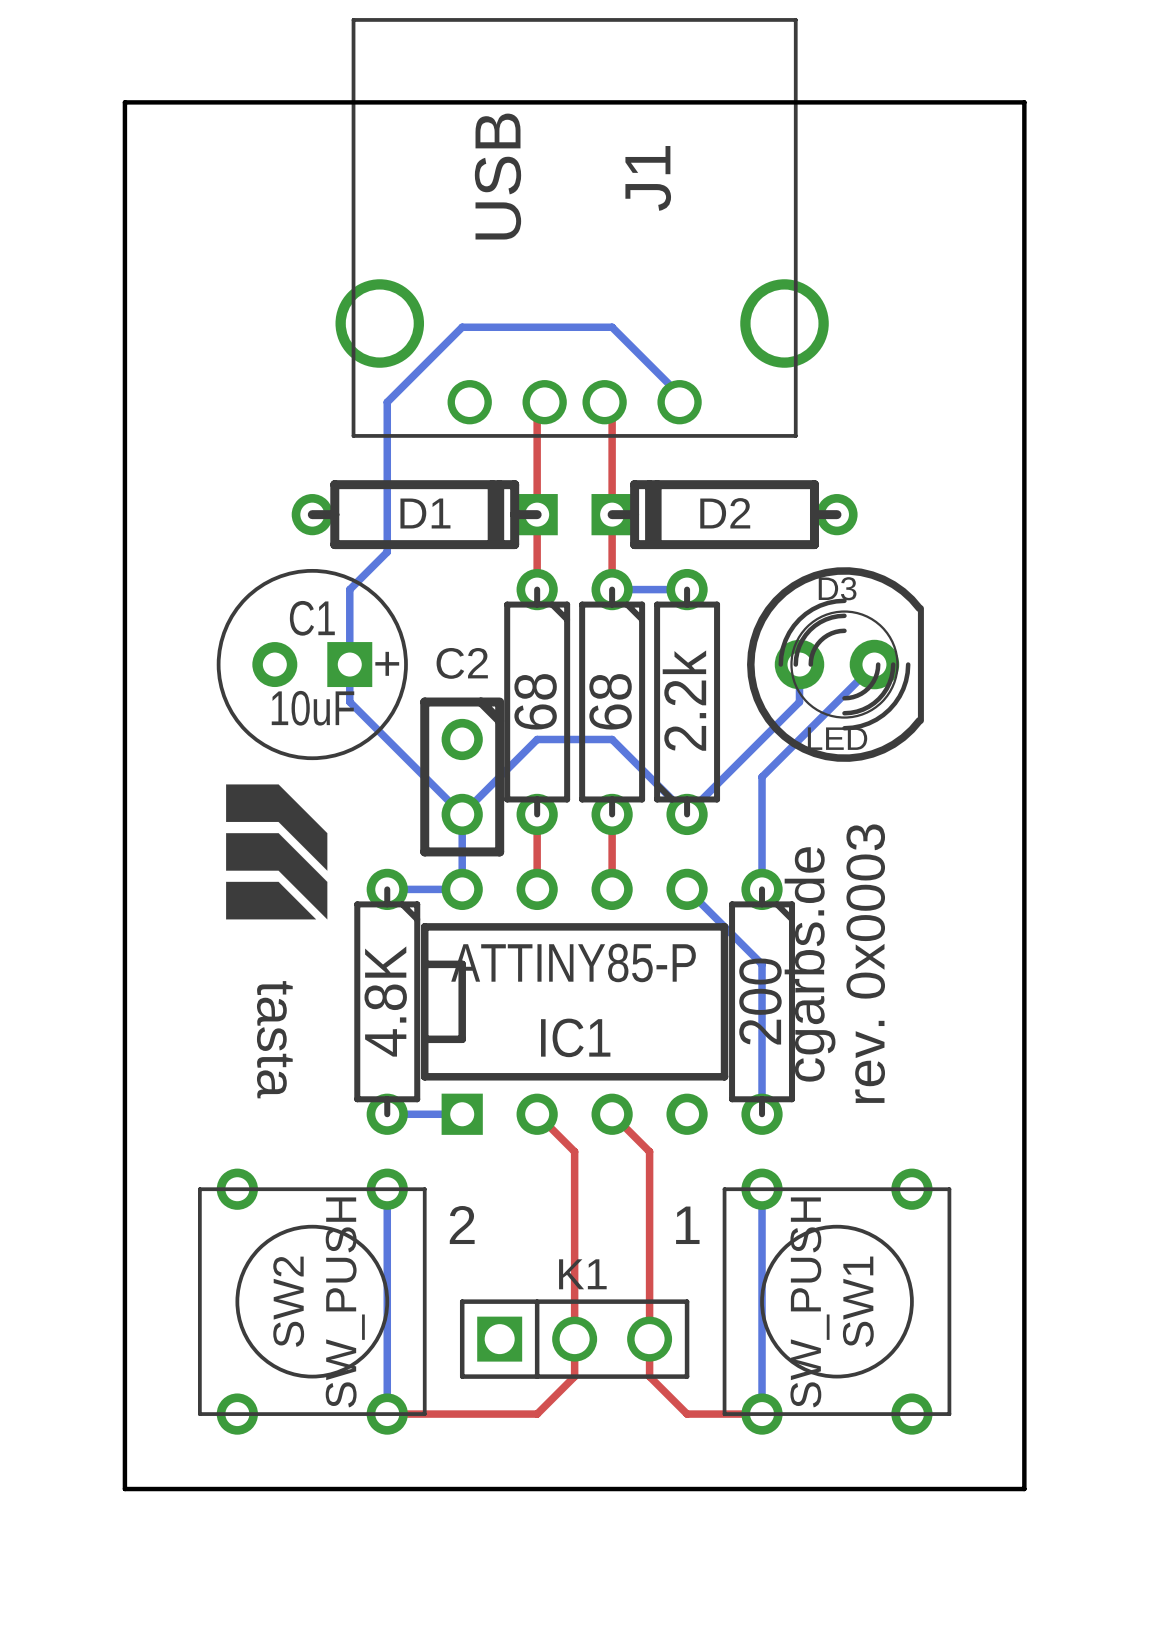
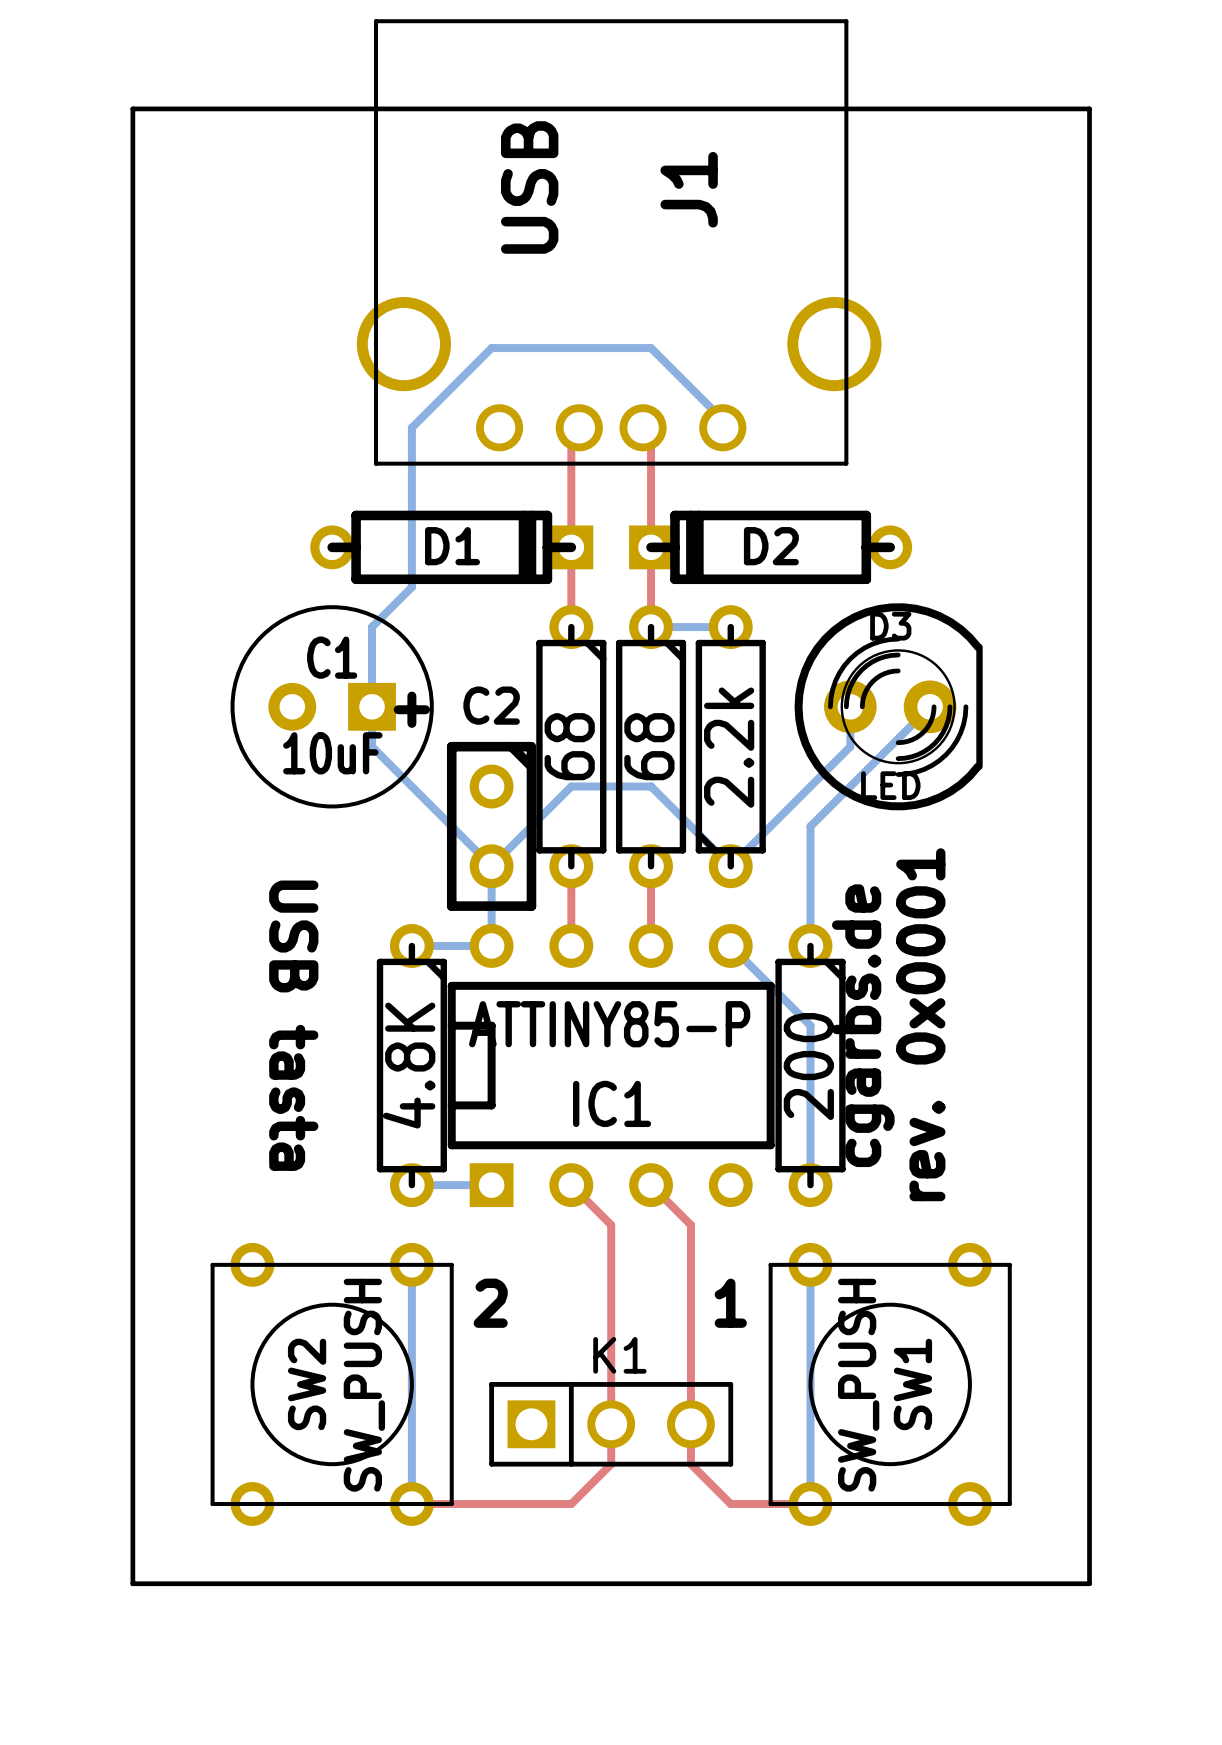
drawing: [226, 784, 328, 920] -> none
text: rev. 0x0003 (865, 963) -> rev. 0x0001 (920, 1024)
text: tasta (274, 1039) -> USB tasta (293, 1025)

